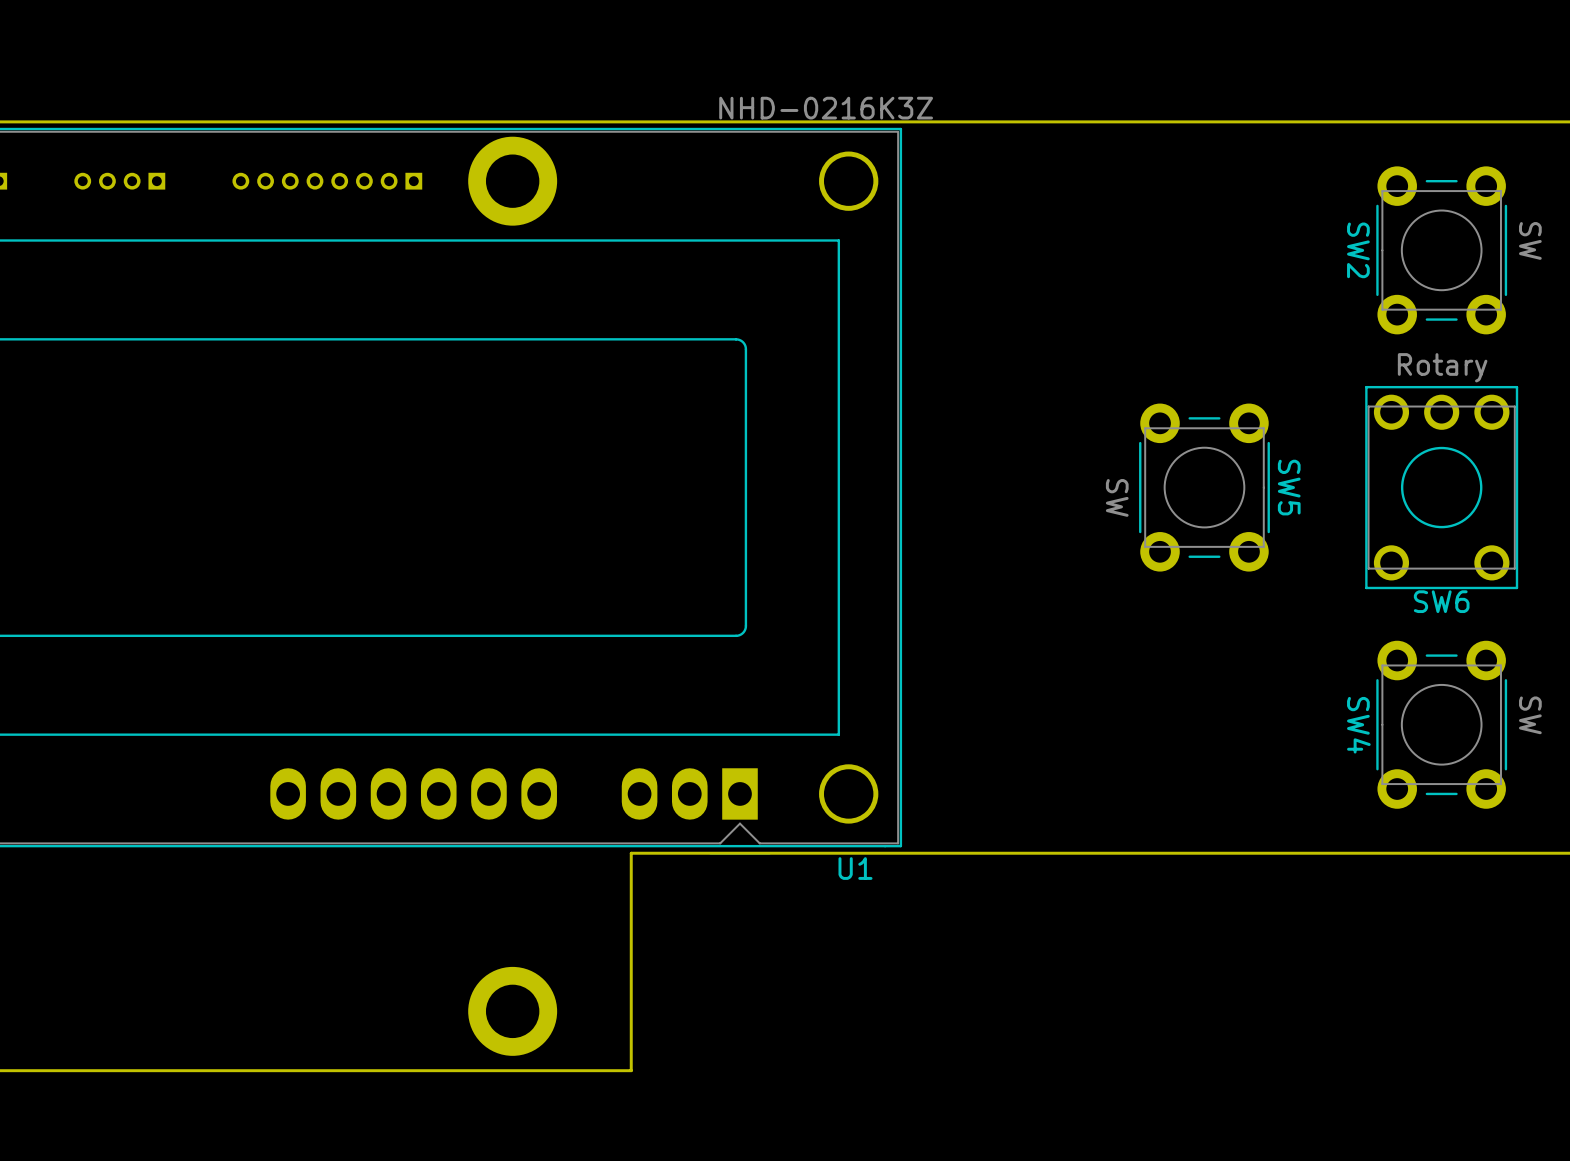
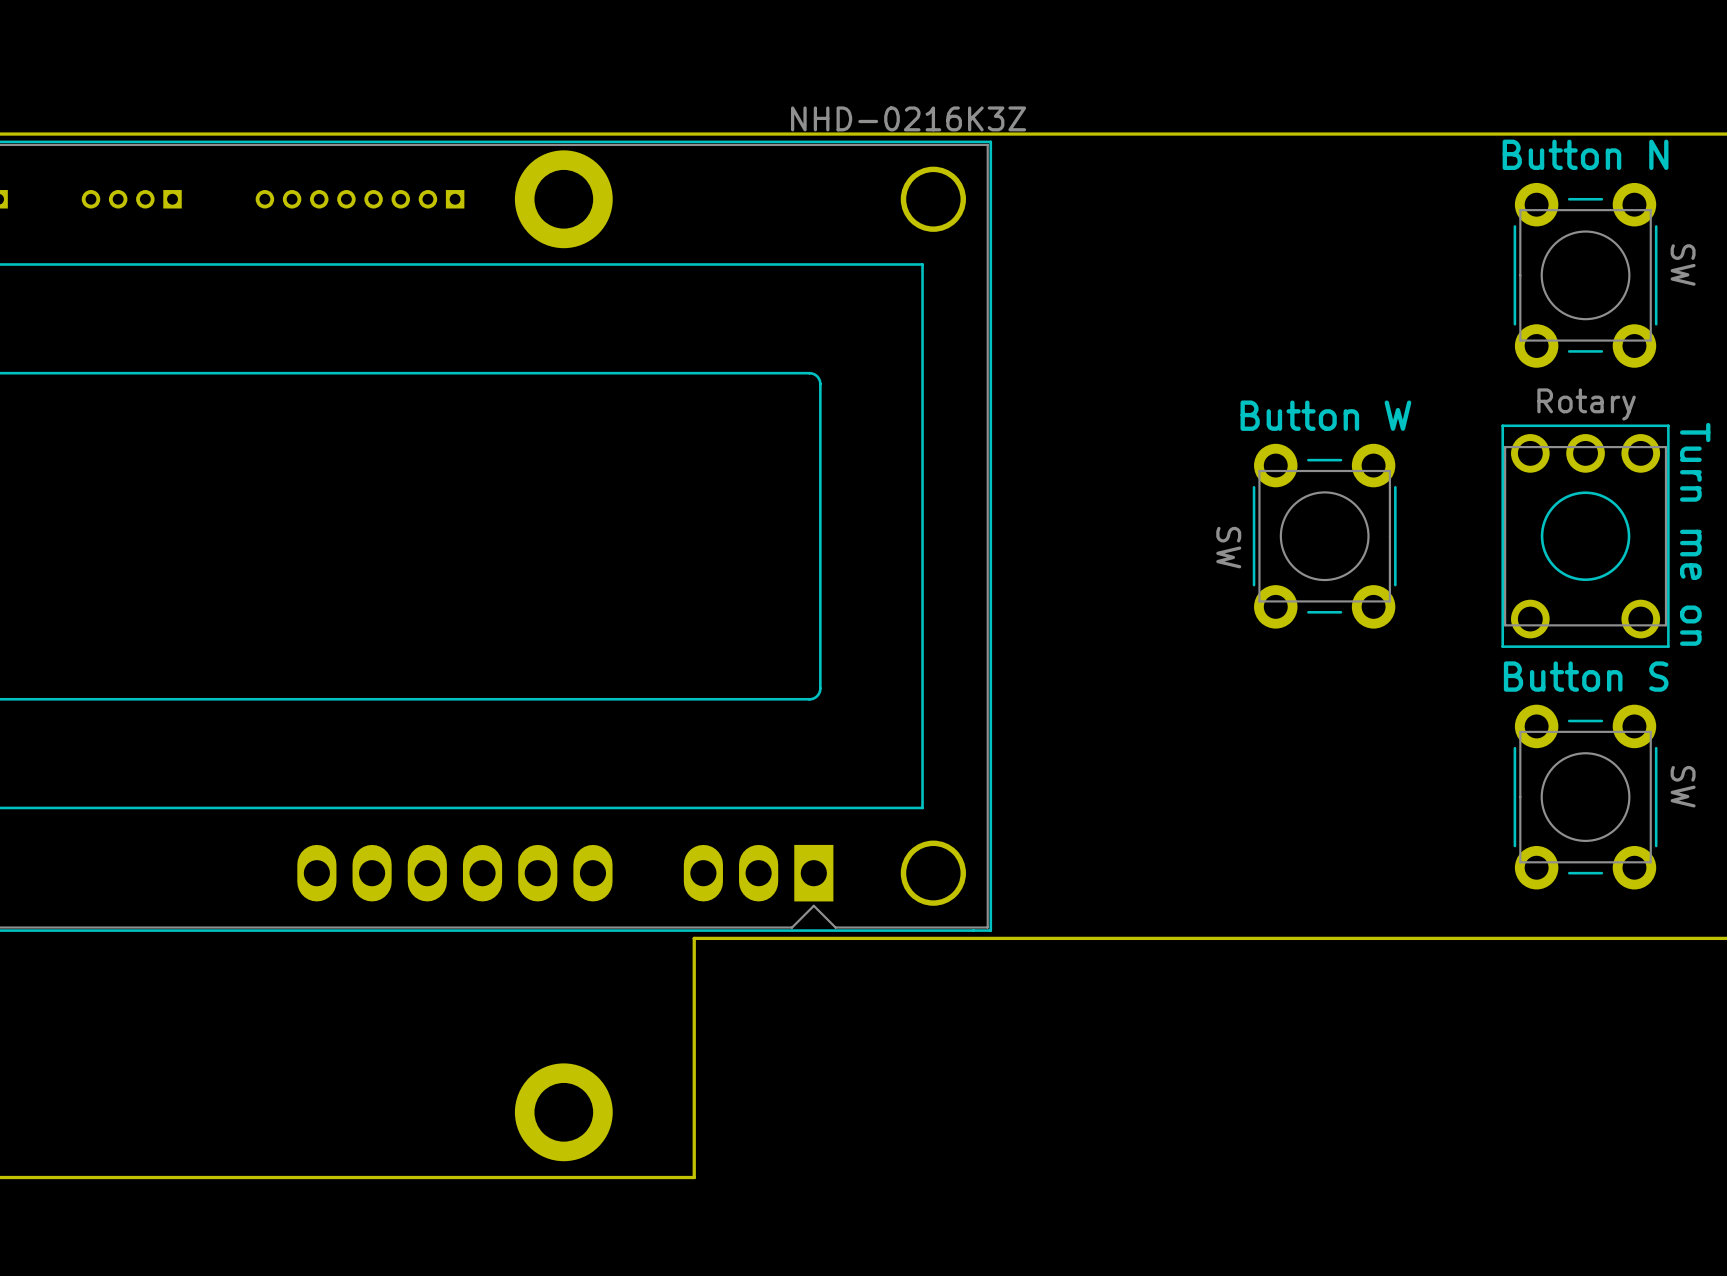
text: none -> Button N (1585, 154)
SW2 name: SW2 (1358, 250) -> none
text: none -> Button W (1325, 415)
text: none -> Turn me on (1695, 534)
SW5 name: SW5 (1289, 487) -> none
SW6 name: SW6 (1441, 601) -> none
text: none -> Button S (1586, 676)
SW4 name: SW4 (1358, 725) -> none
U1 name: U1 (855, 868) -> none

